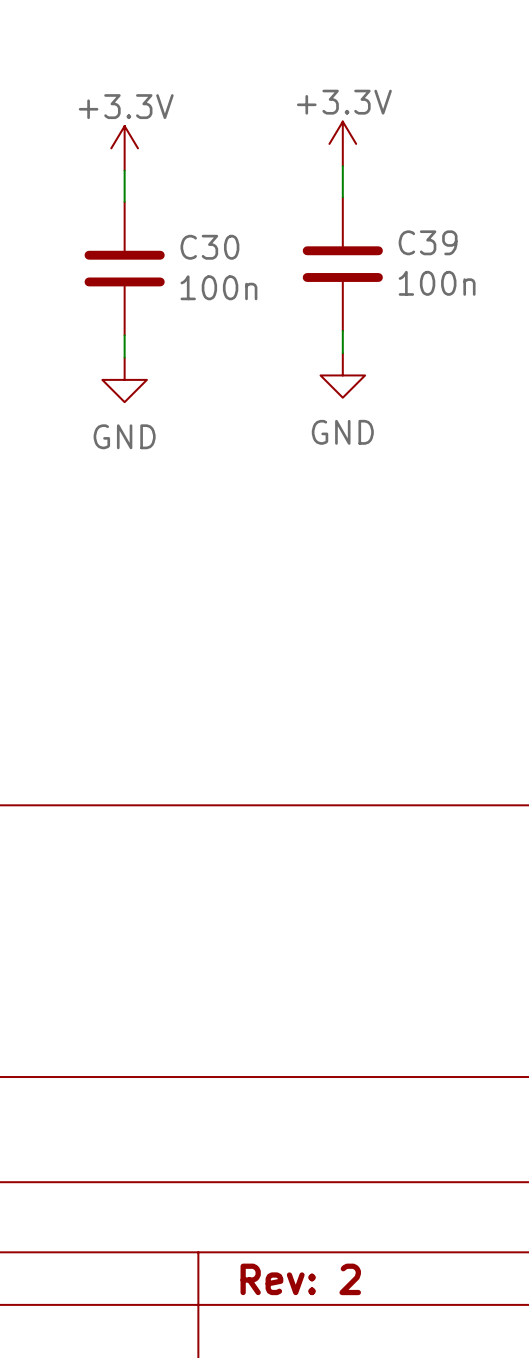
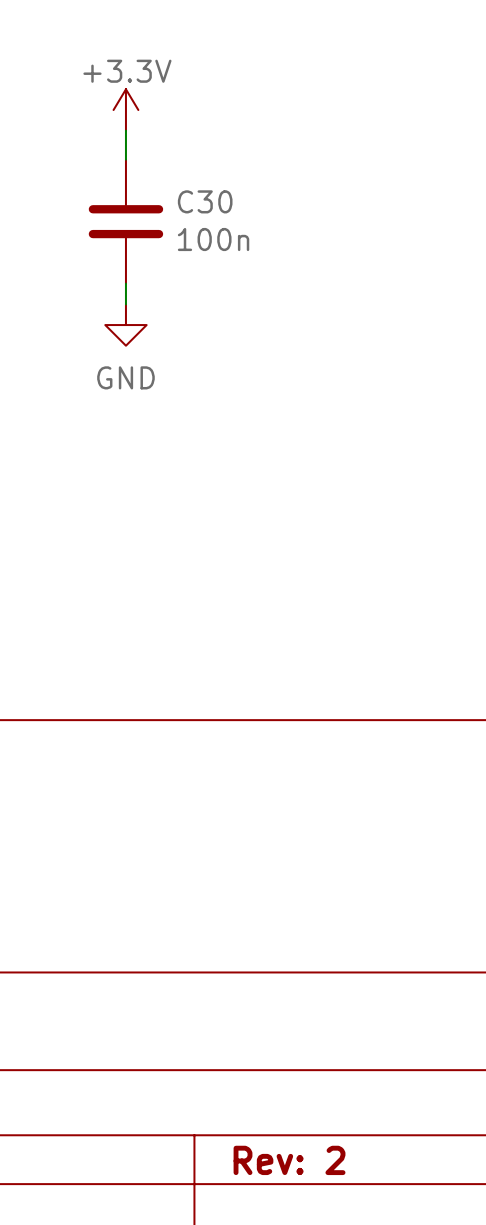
power symbol: +3.3V (342, 143) -> none
wire: (342, 166) (342, 197) -> none
C39: 100n (342, 264) -> none
wire: (342, 330) (342, 353) -> none
power symbol: GND (342, 375) -> none

